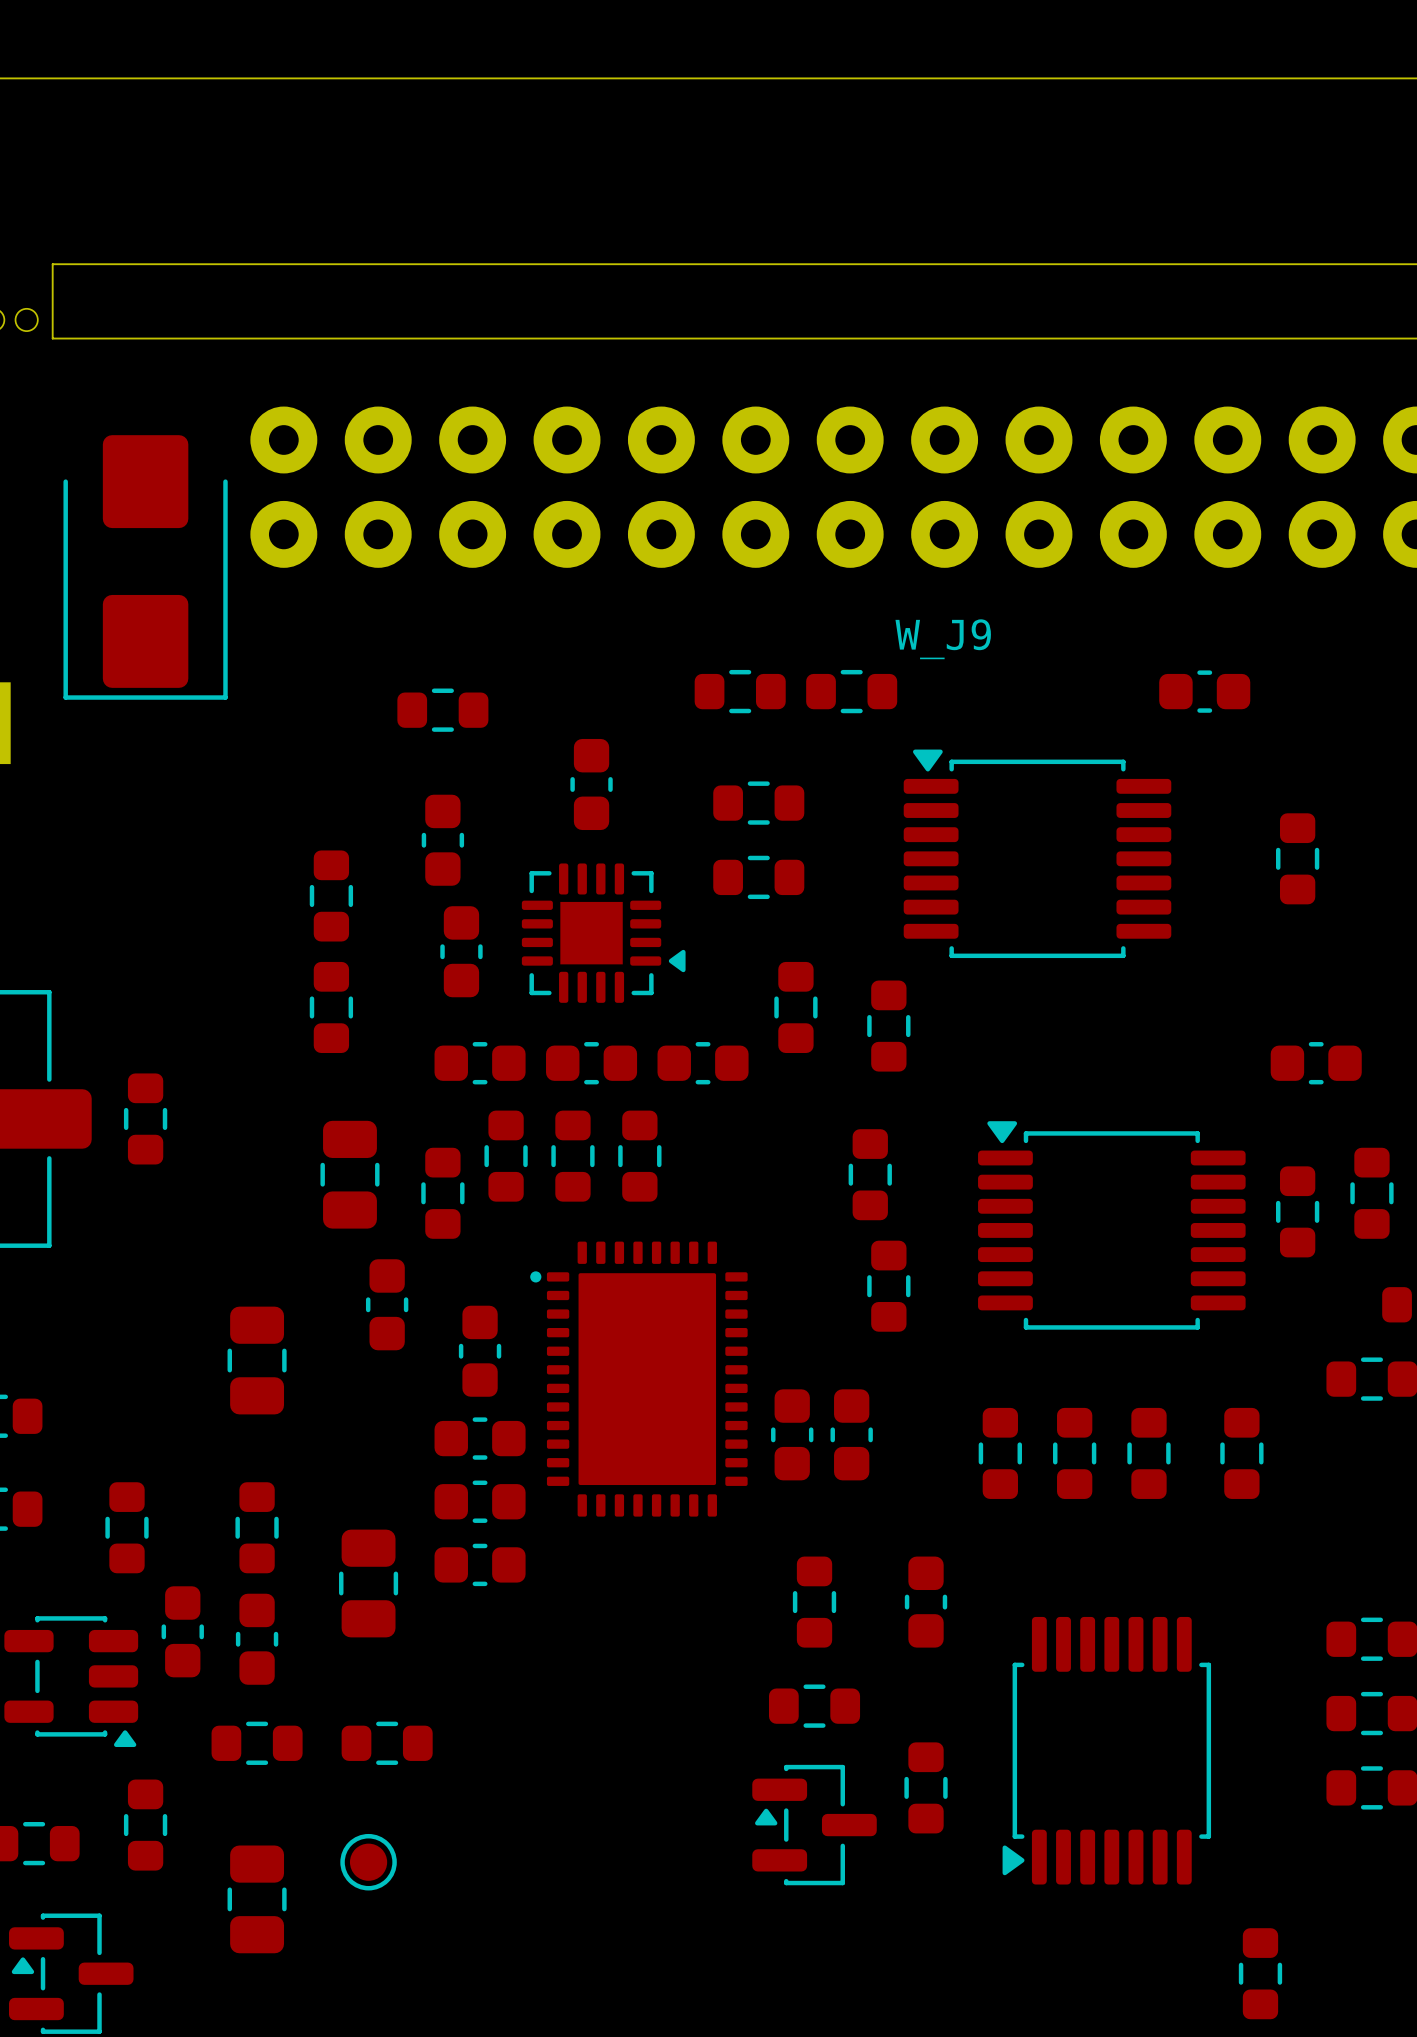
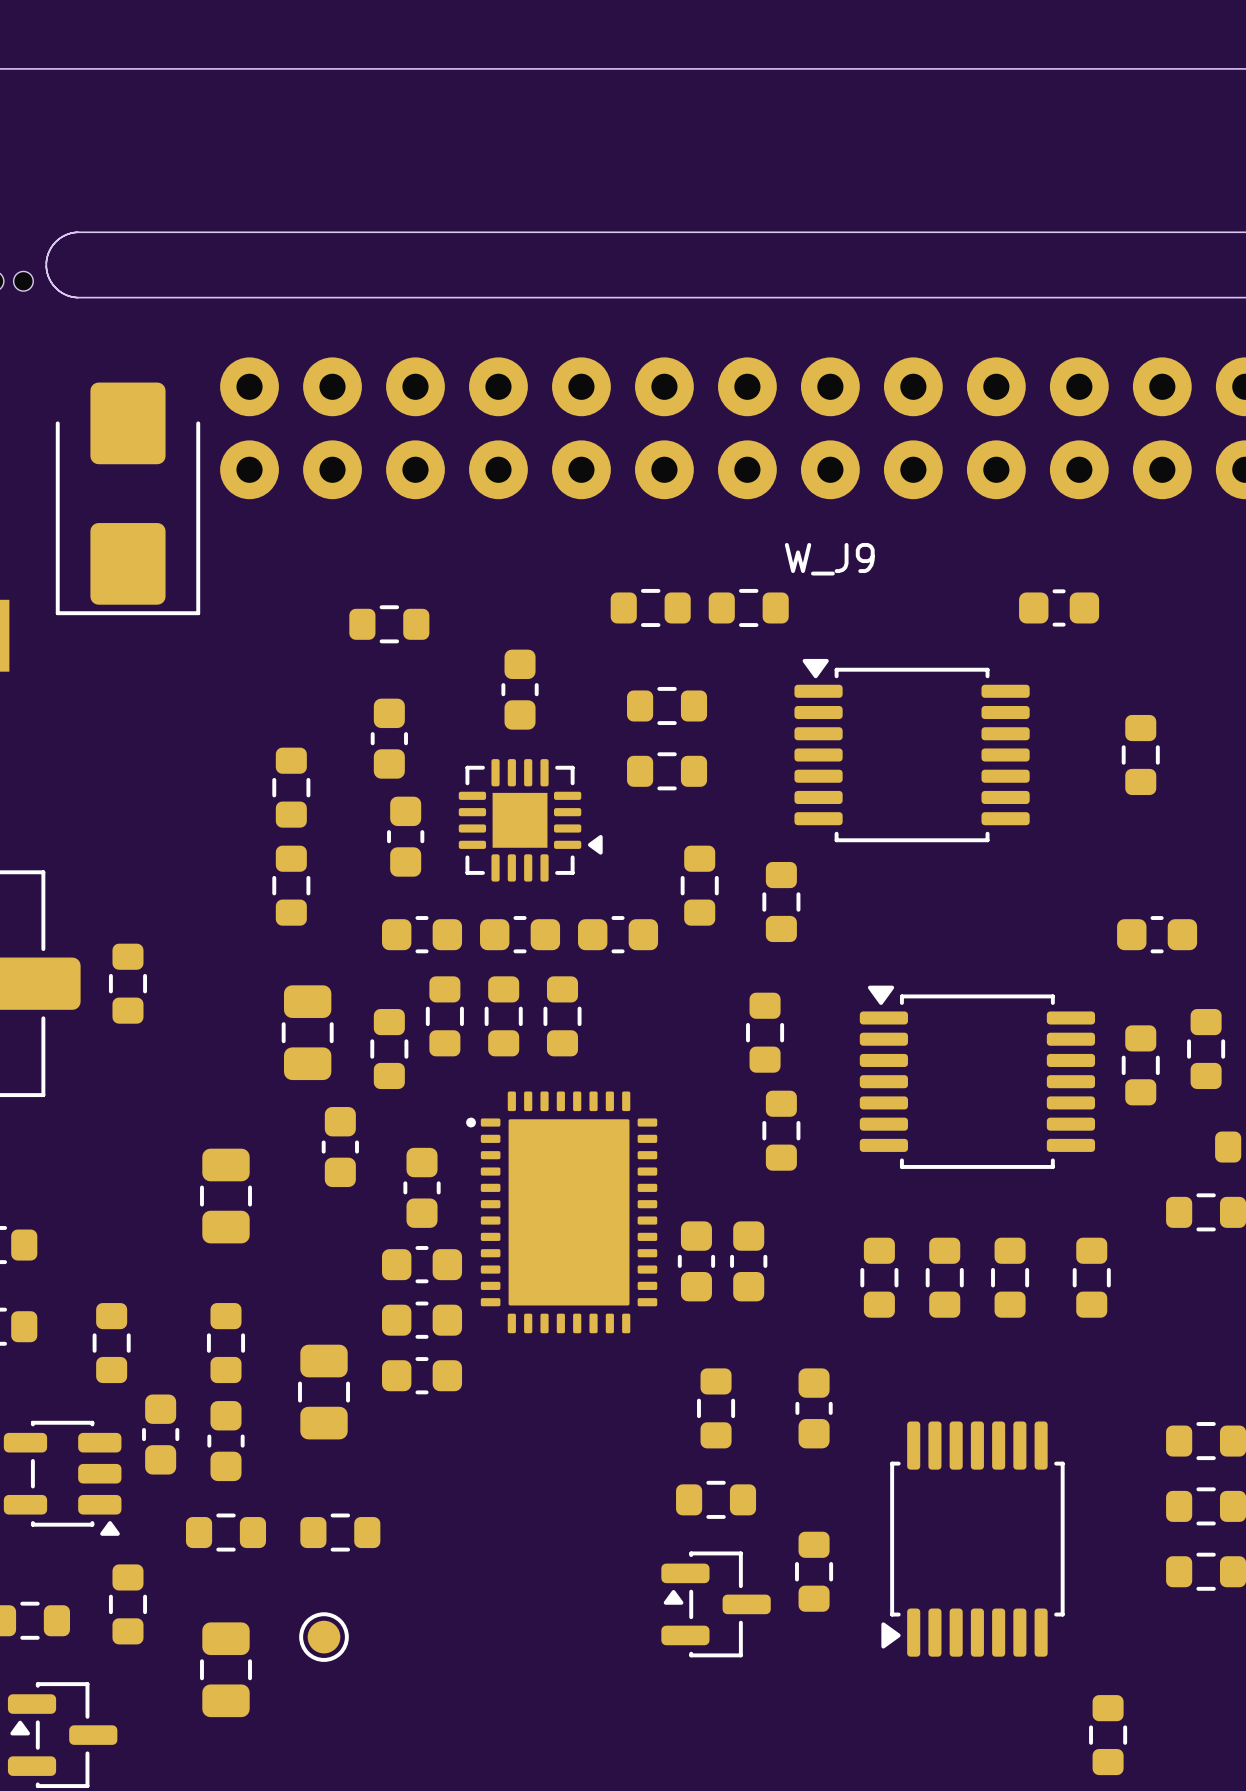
board edge: (88, 264) (52, 264) (52, 300) -> (77, 232) (66, 234) (55, 241) (48, 252) (46, 263)
board edge: (52, 302) (52, 338) (88, 338) -> (46, 265) (48, 277) (56, 288) (66, 294) (77, 297)

